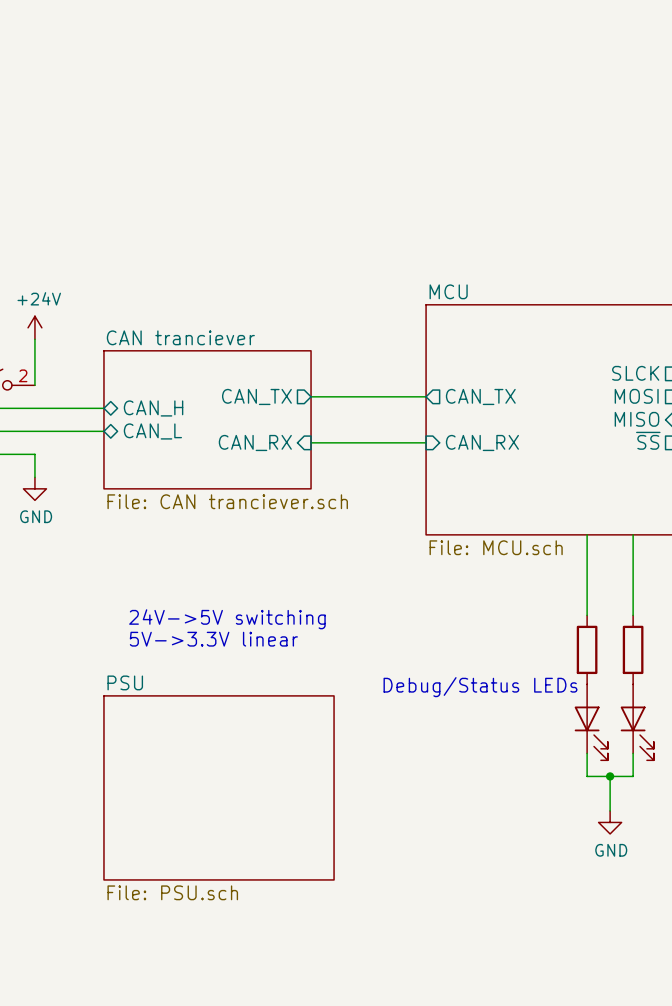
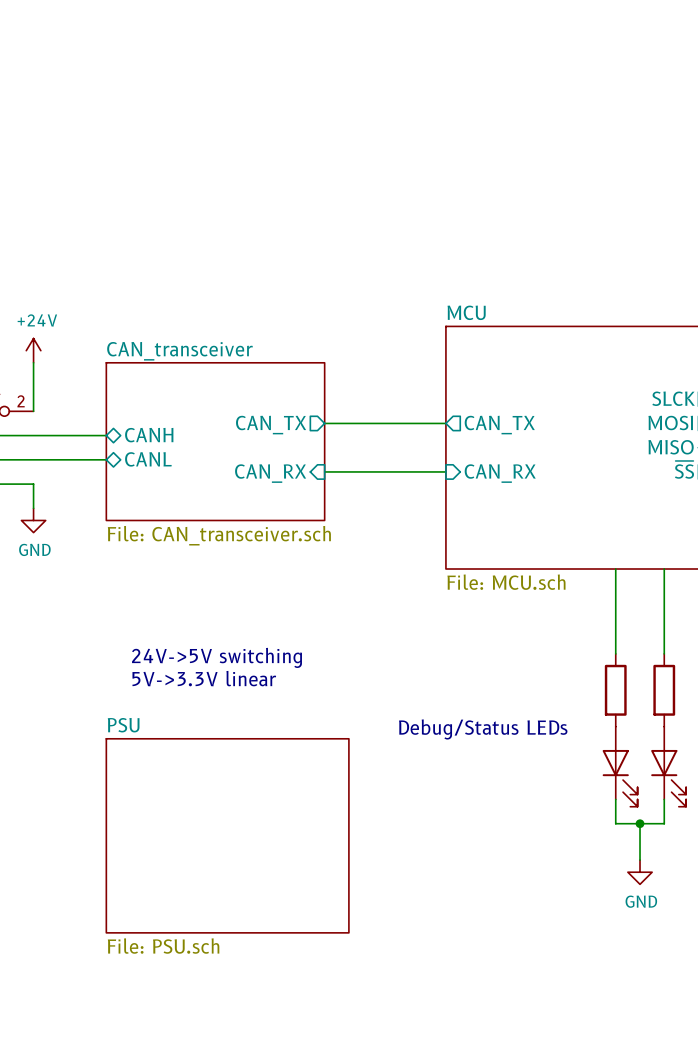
sheet pin: CAN_H (153, 408) -> CANH (149, 435)
sheet CAN_transceiver: none -> File: CAN_transceiver.sch (215, 441)
sheet CAN tranciever: File: CAN tranciever.sch (207, 419) -> none
sheet pin: CAN_L (152, 431) -> CANL (148, 459)

